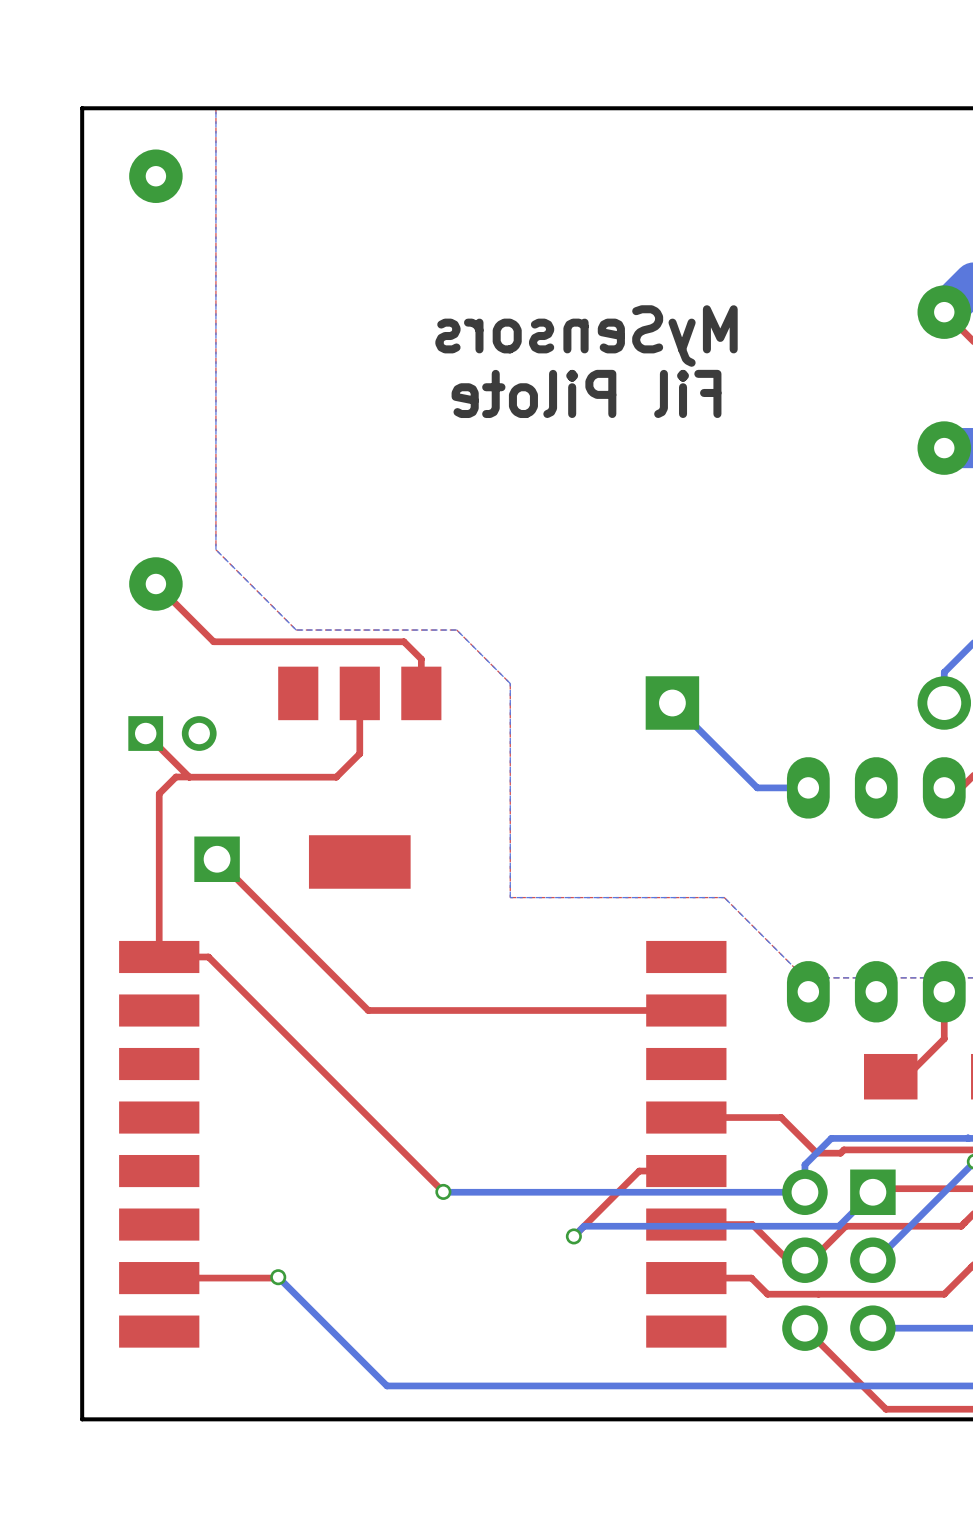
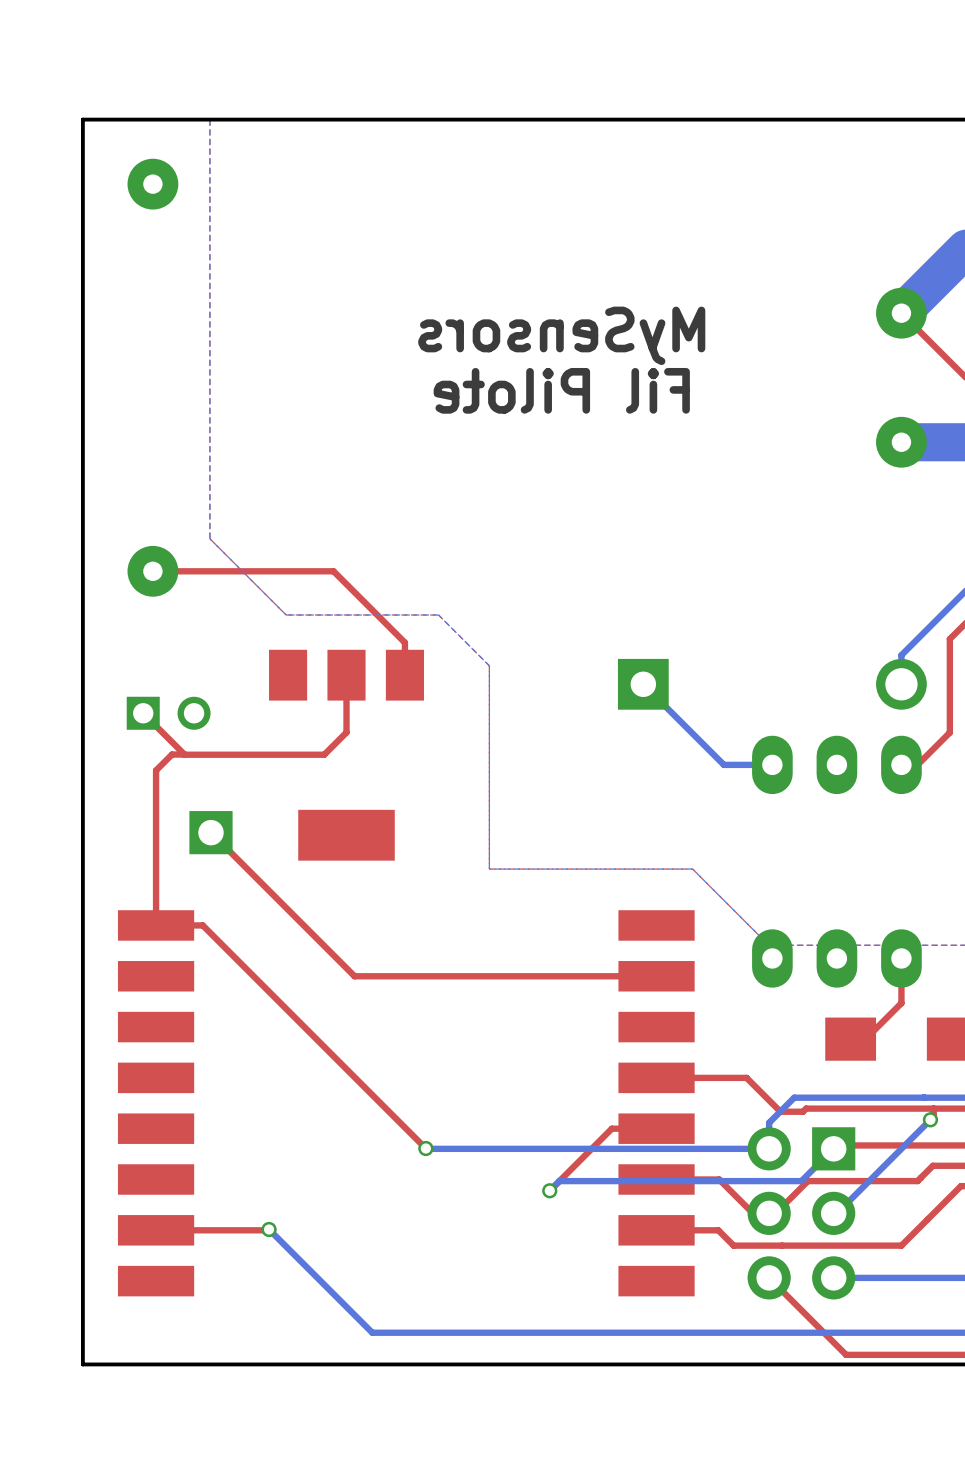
top track: (155, 584) (213, 641) (403, 641) -> (152, 571) (333, 571) (388, 626)

